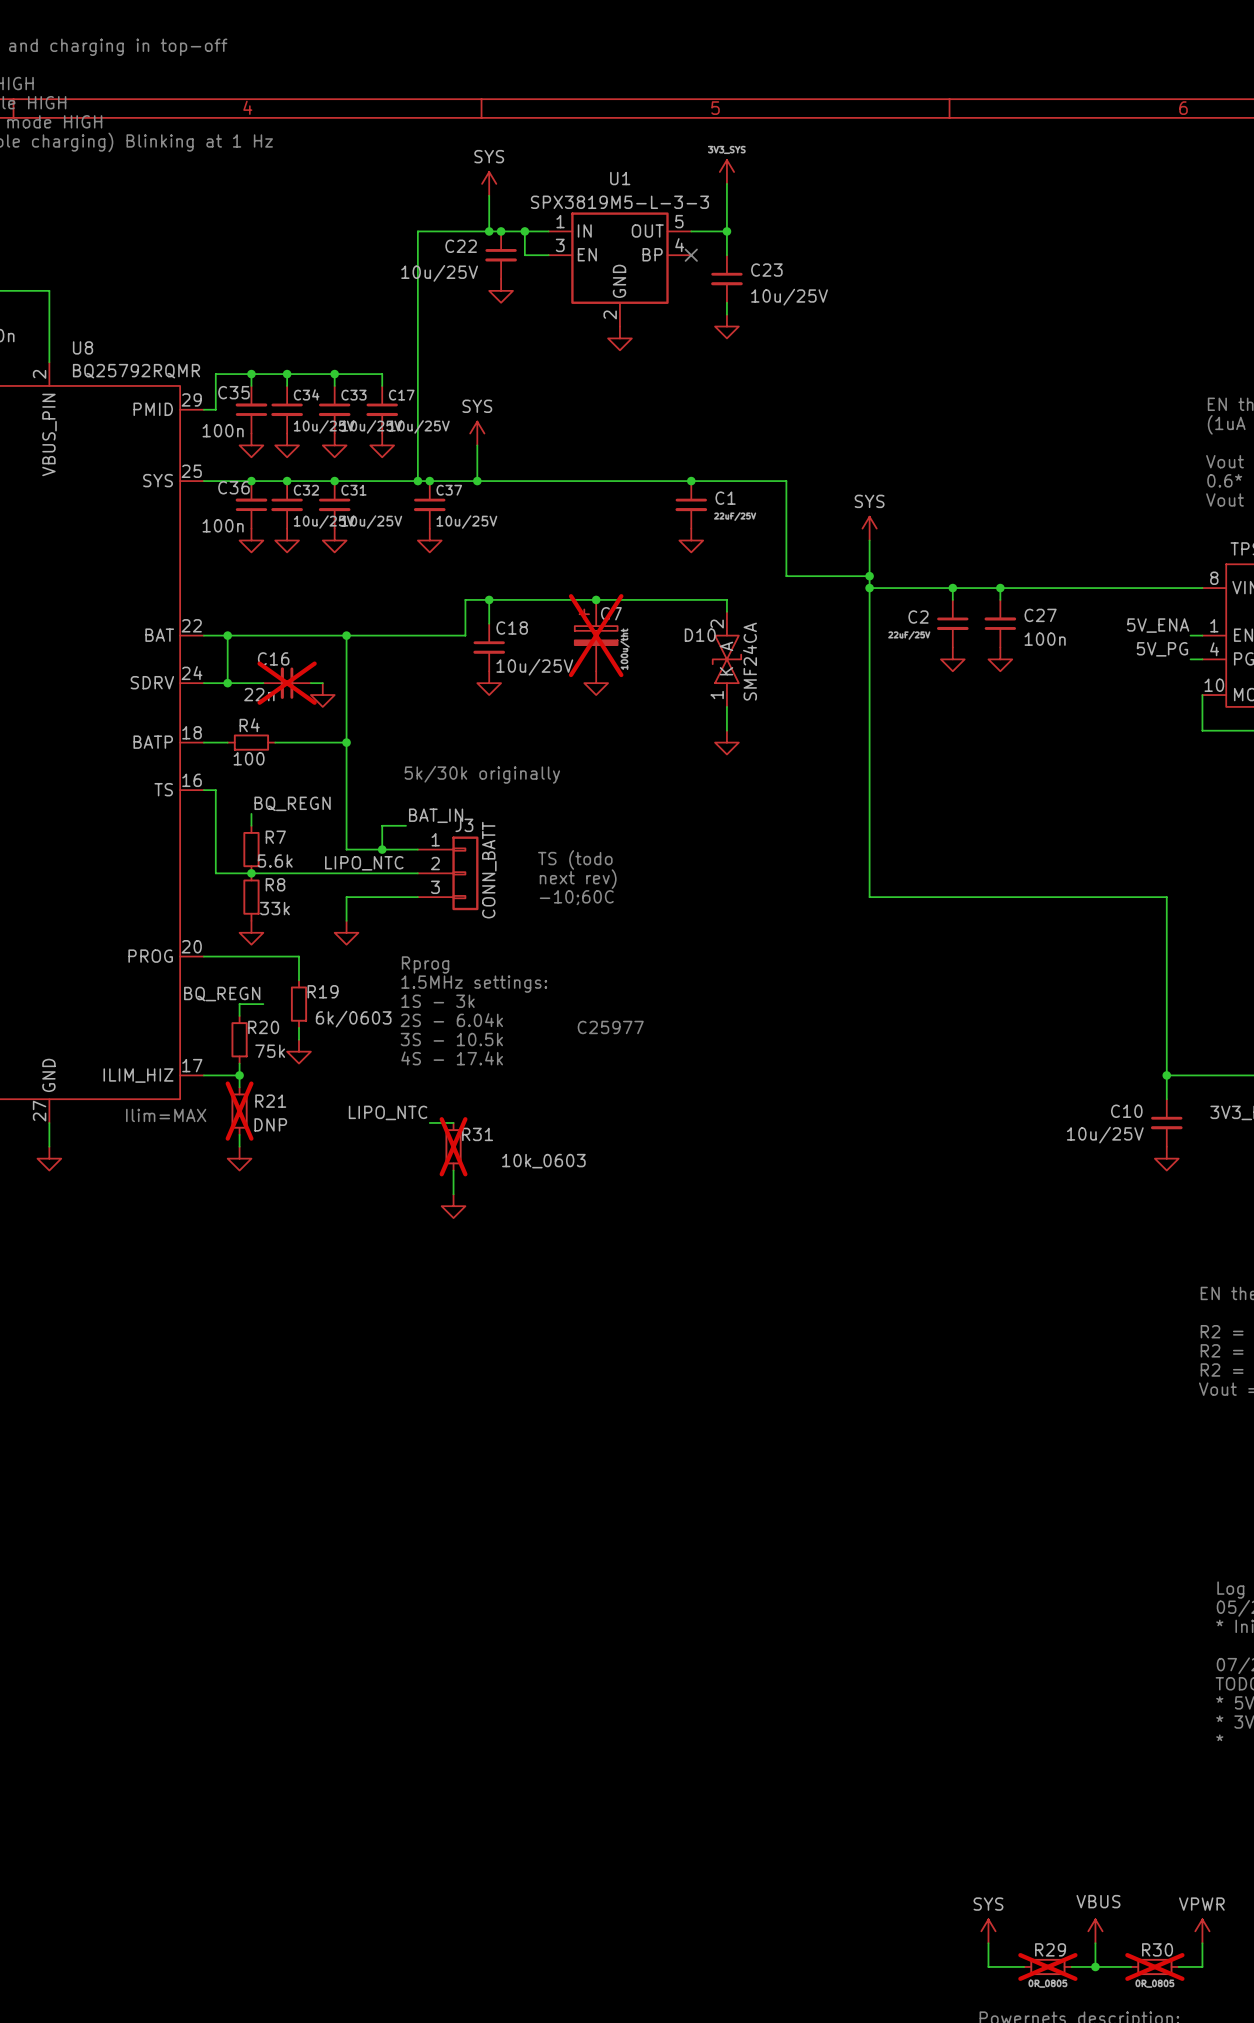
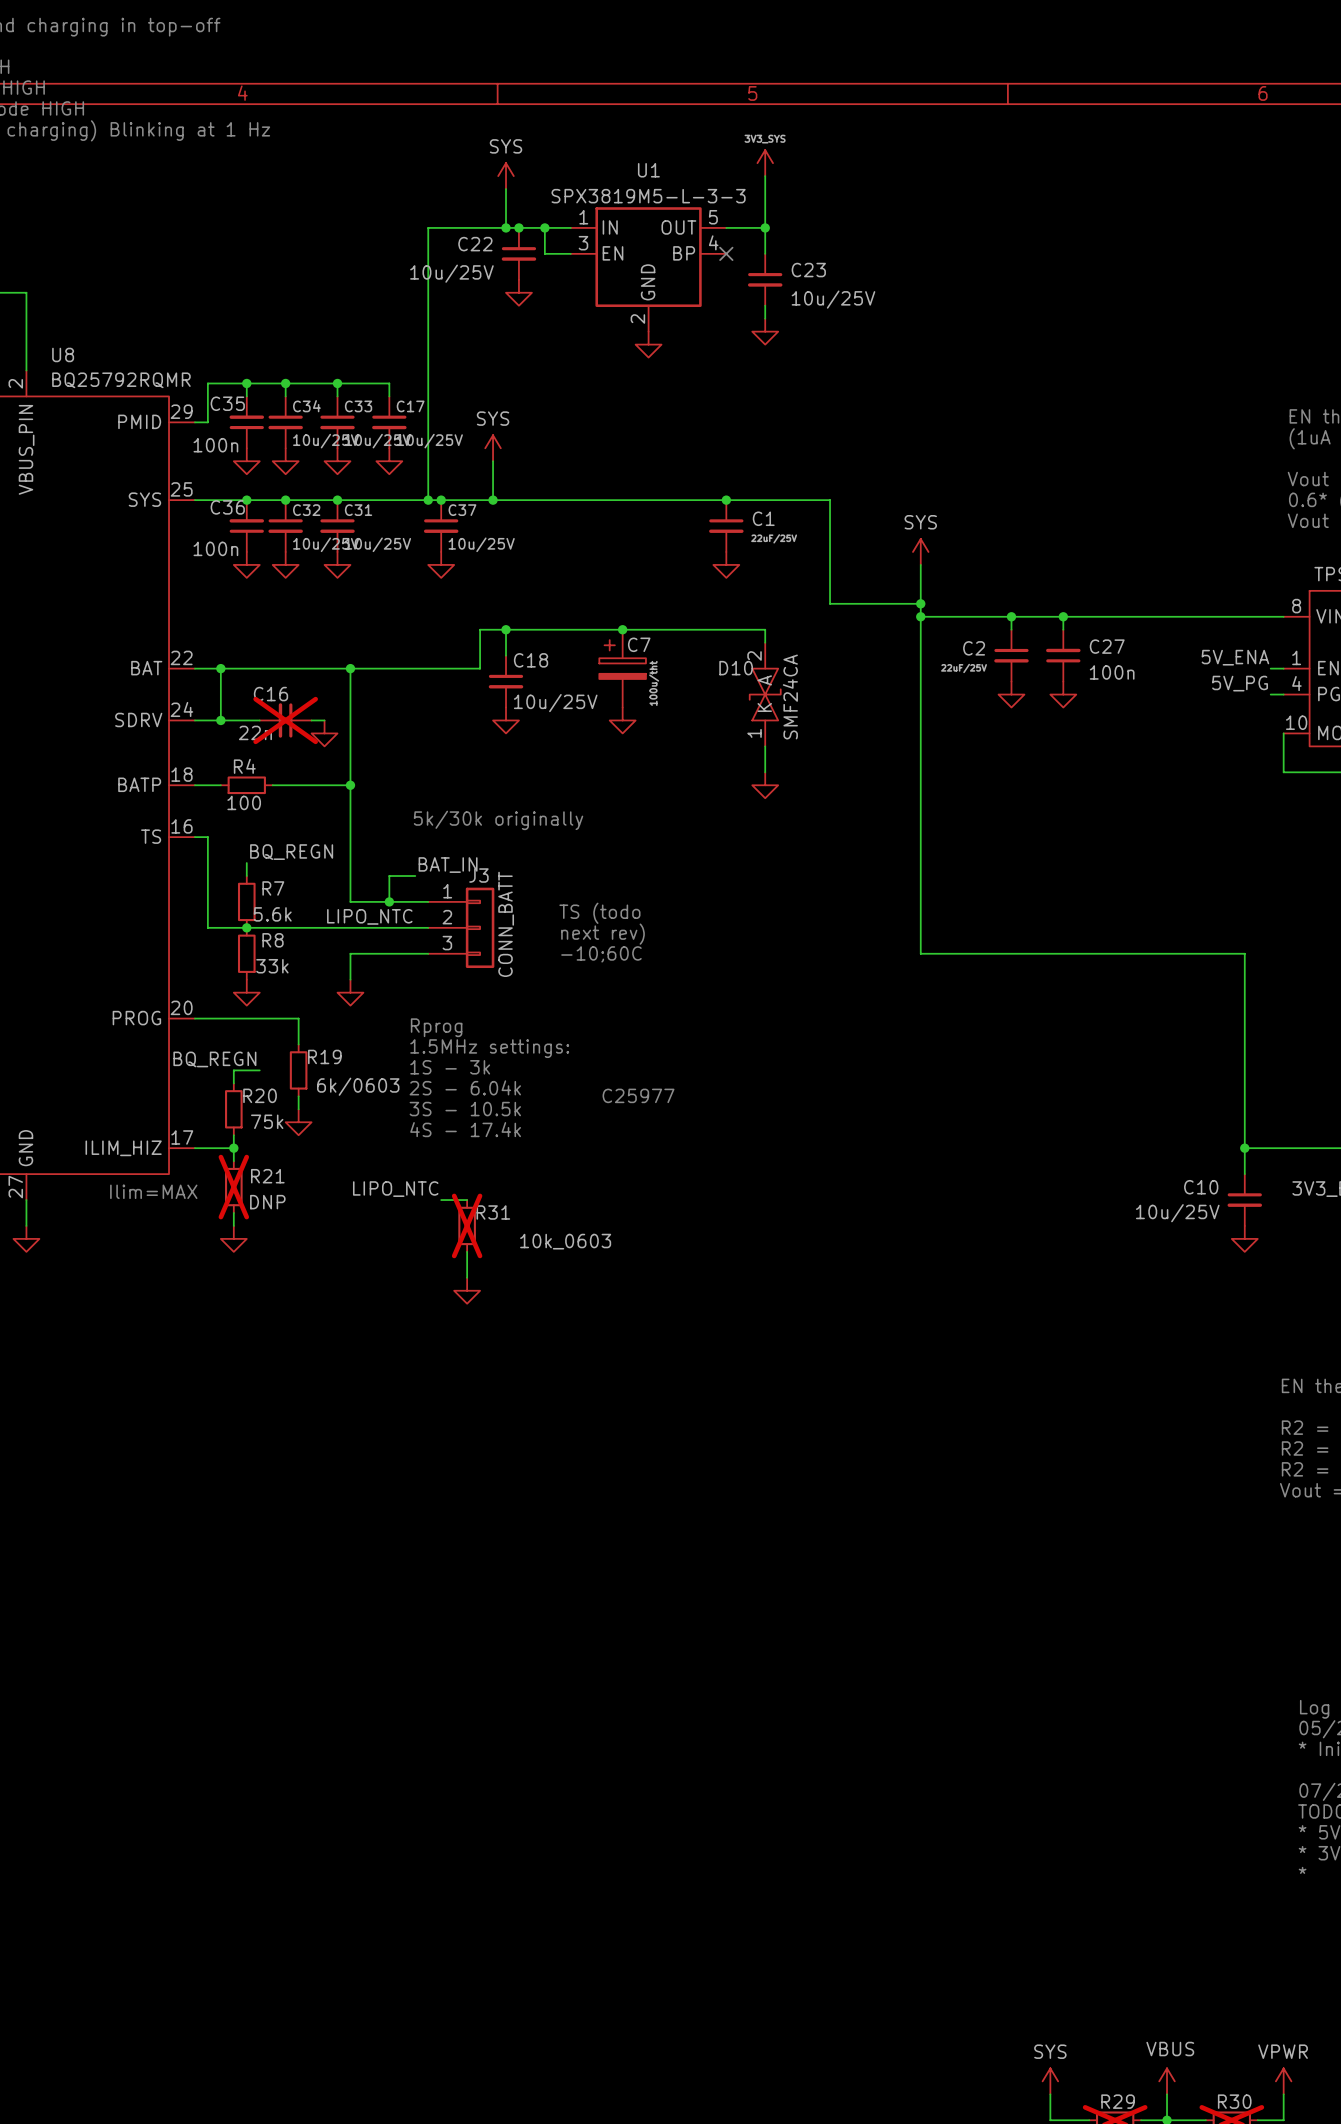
C7 do-not-place cross: (596, 635) -> none

